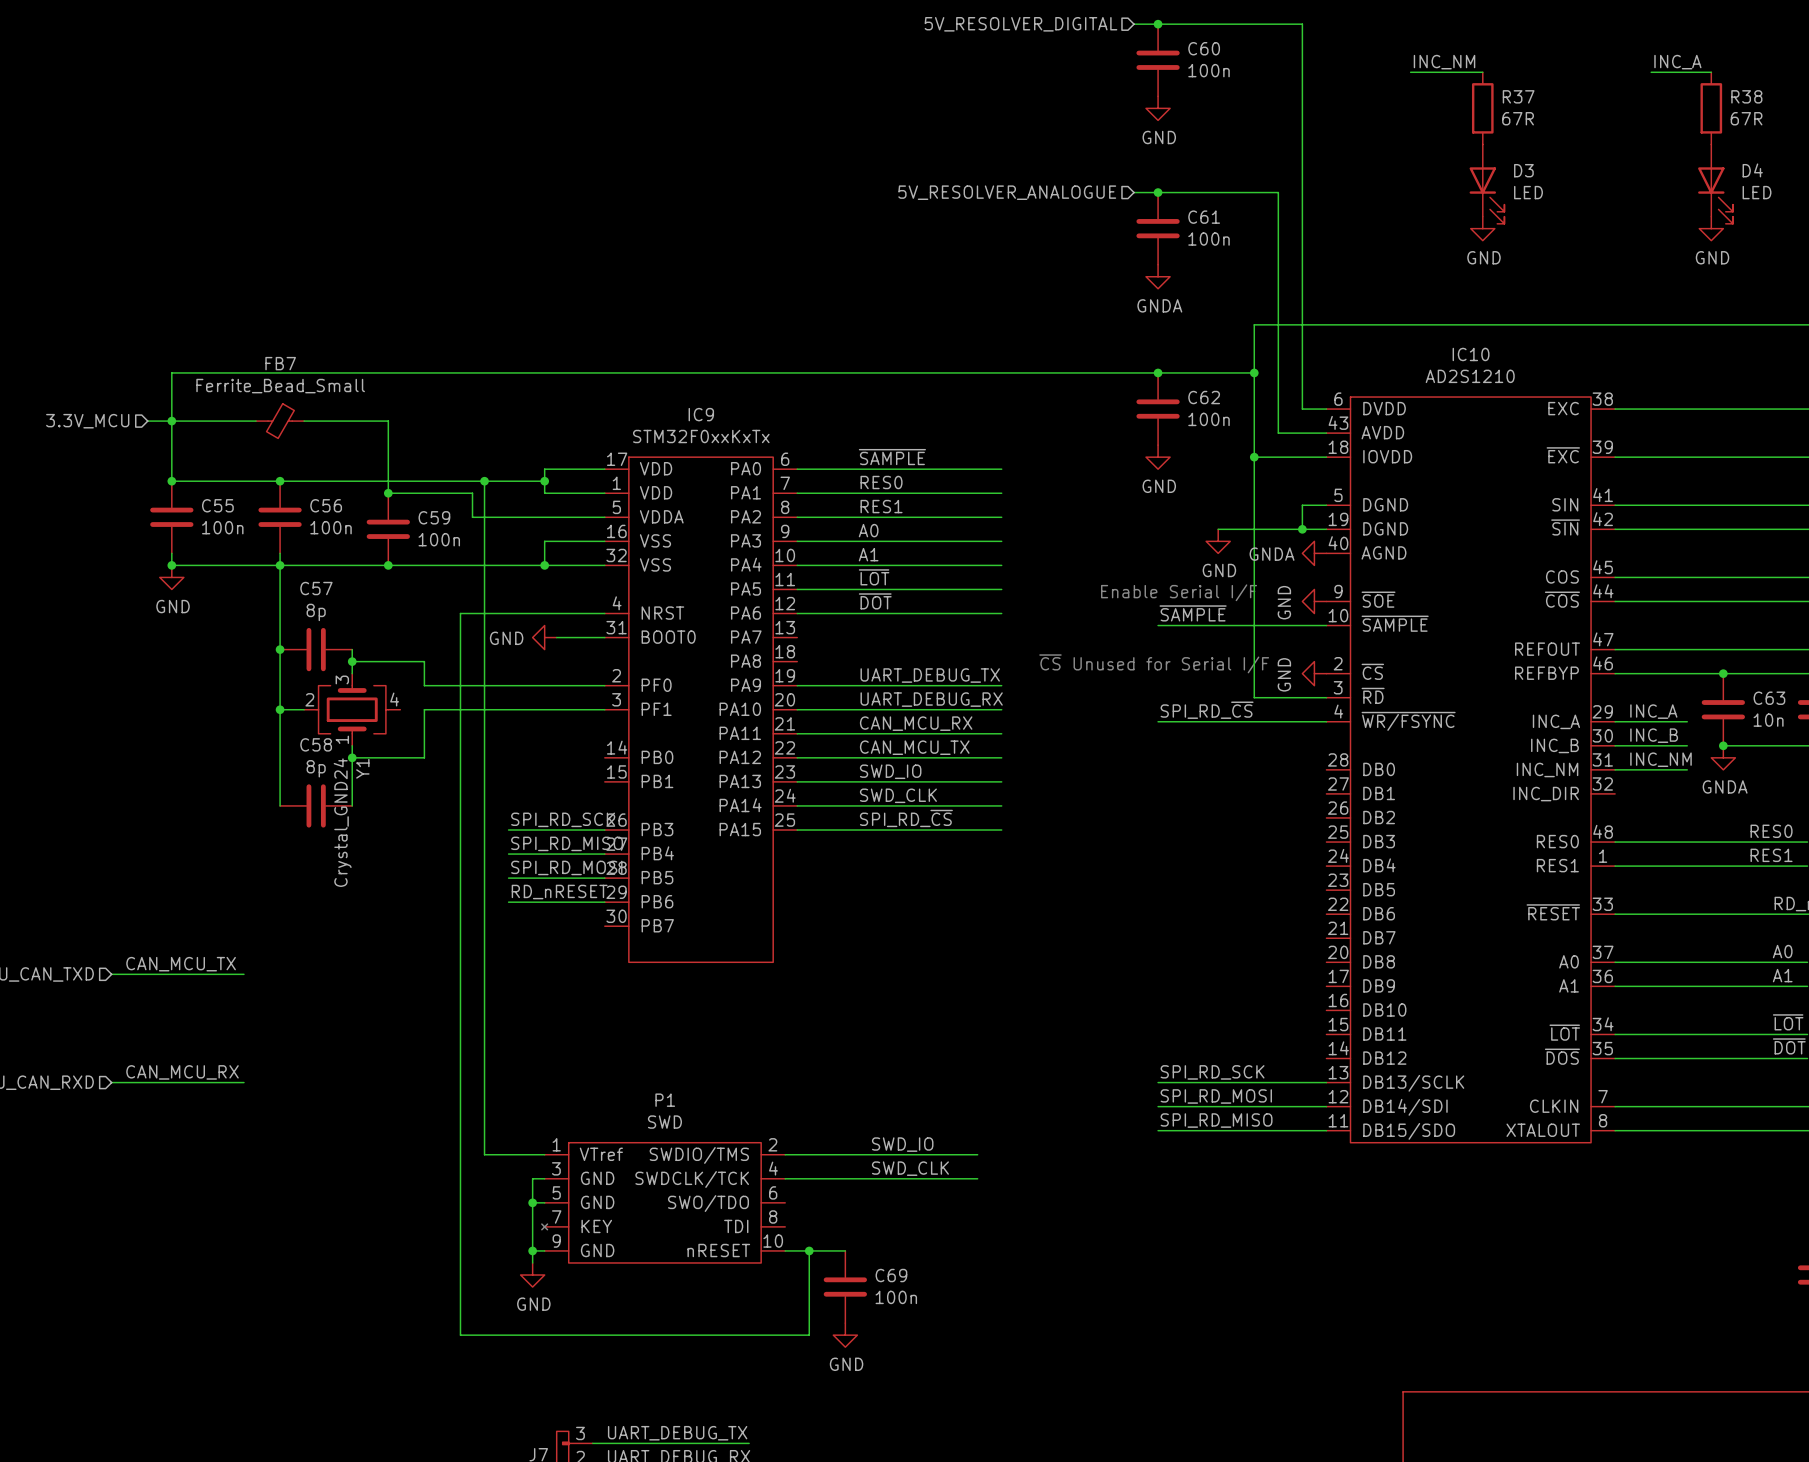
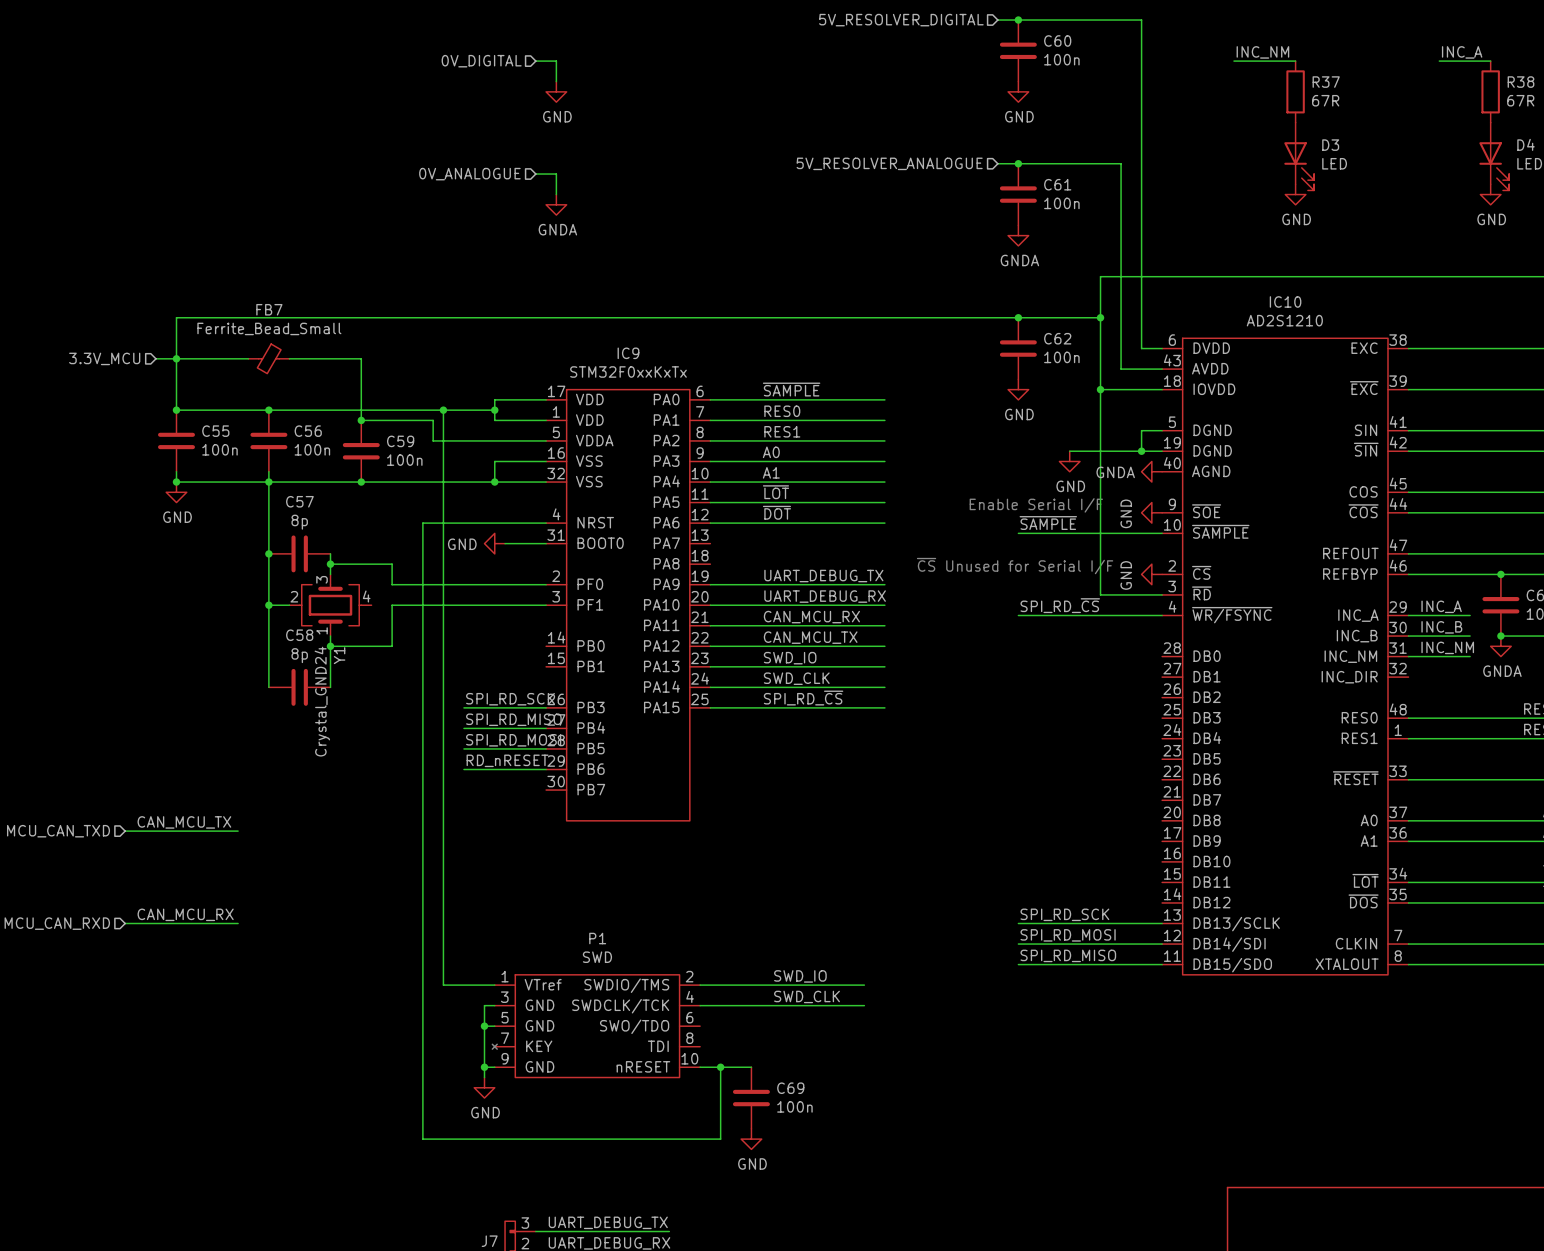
hierarchical label: none -> 0V_DIGITAL (481, 61)
wire: none -> (535, 61) (556, 61) (556, 81)
power symbol: none -> GND (556, 91)
hierarchical label: none -> 0V_ANALOGUE (469, 174)
wire: none -> (535, 174) (556, 174) (556, 194)
power symbol: none -> GNDA (556, 204)

